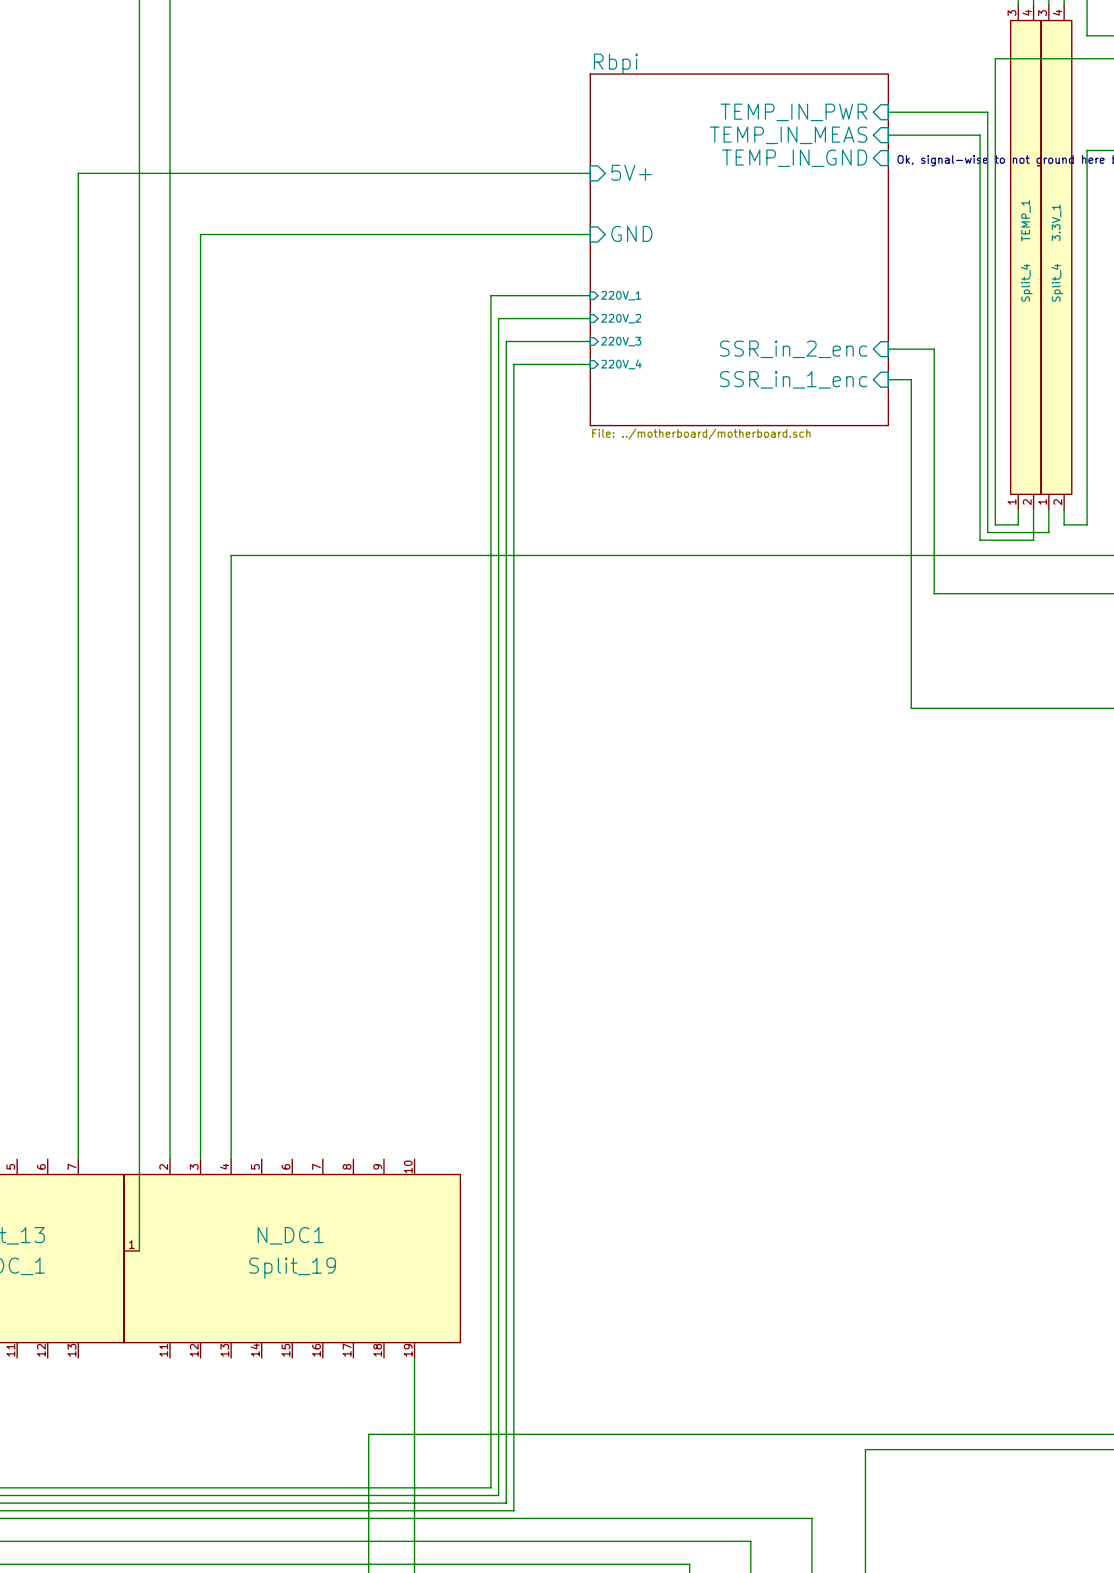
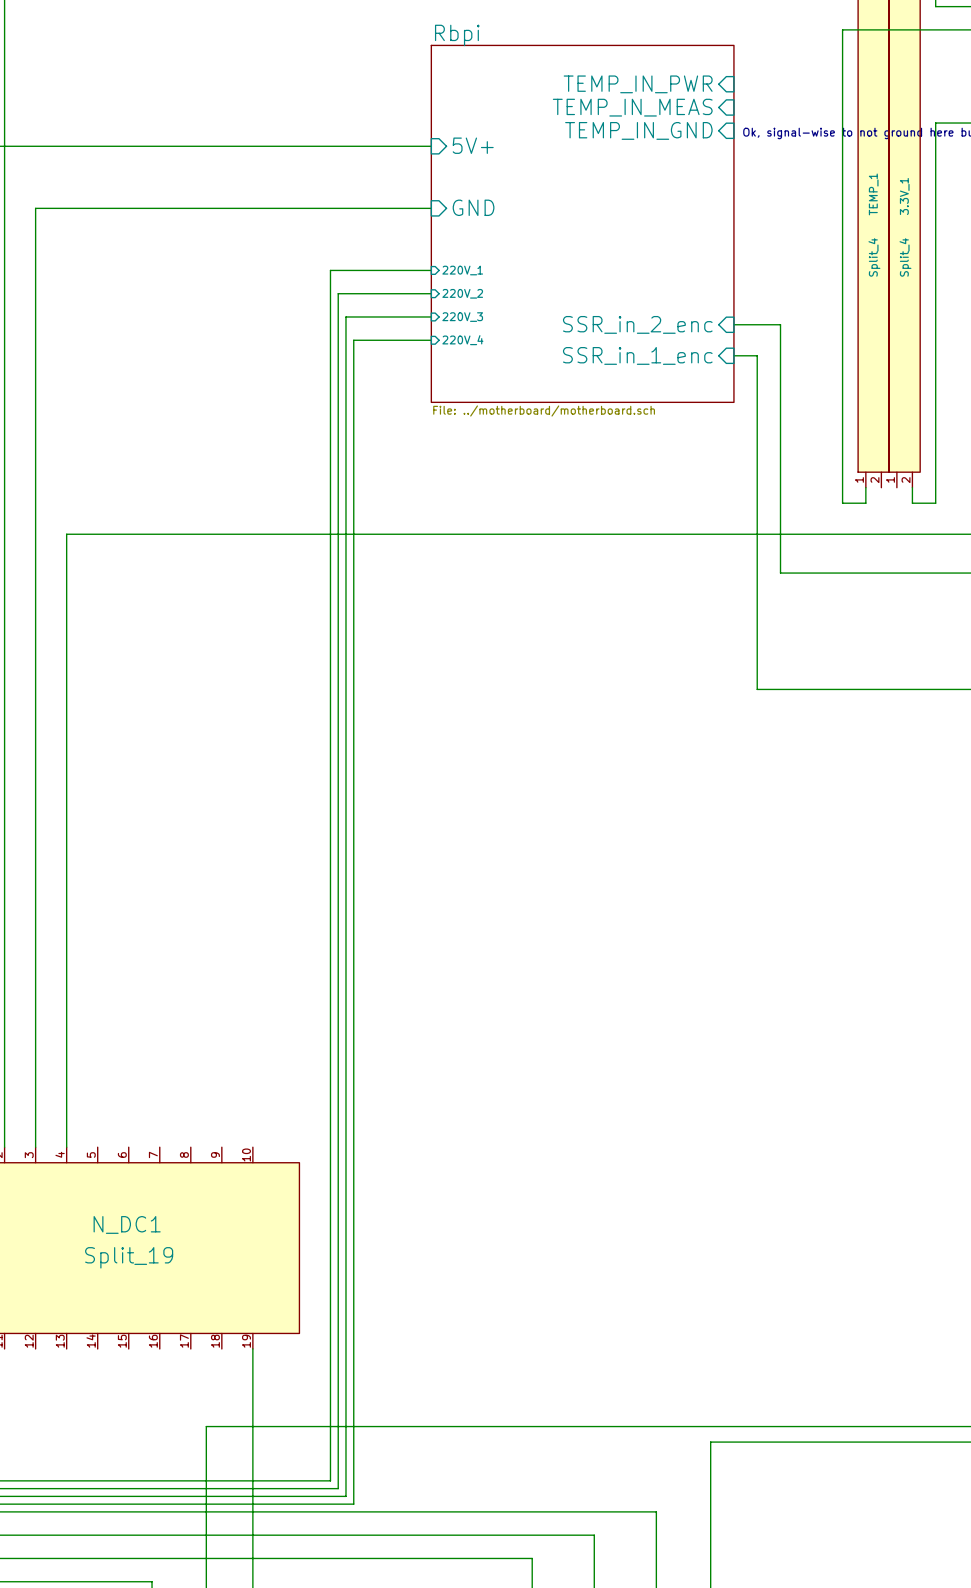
wire: (888, 112) (987, 112) (987, 532) (1048, 532) (1048, 509) -> none
wire: (888, 135) (980, 135) (980, 540) (1033, 540) (1033, 509) -> none

